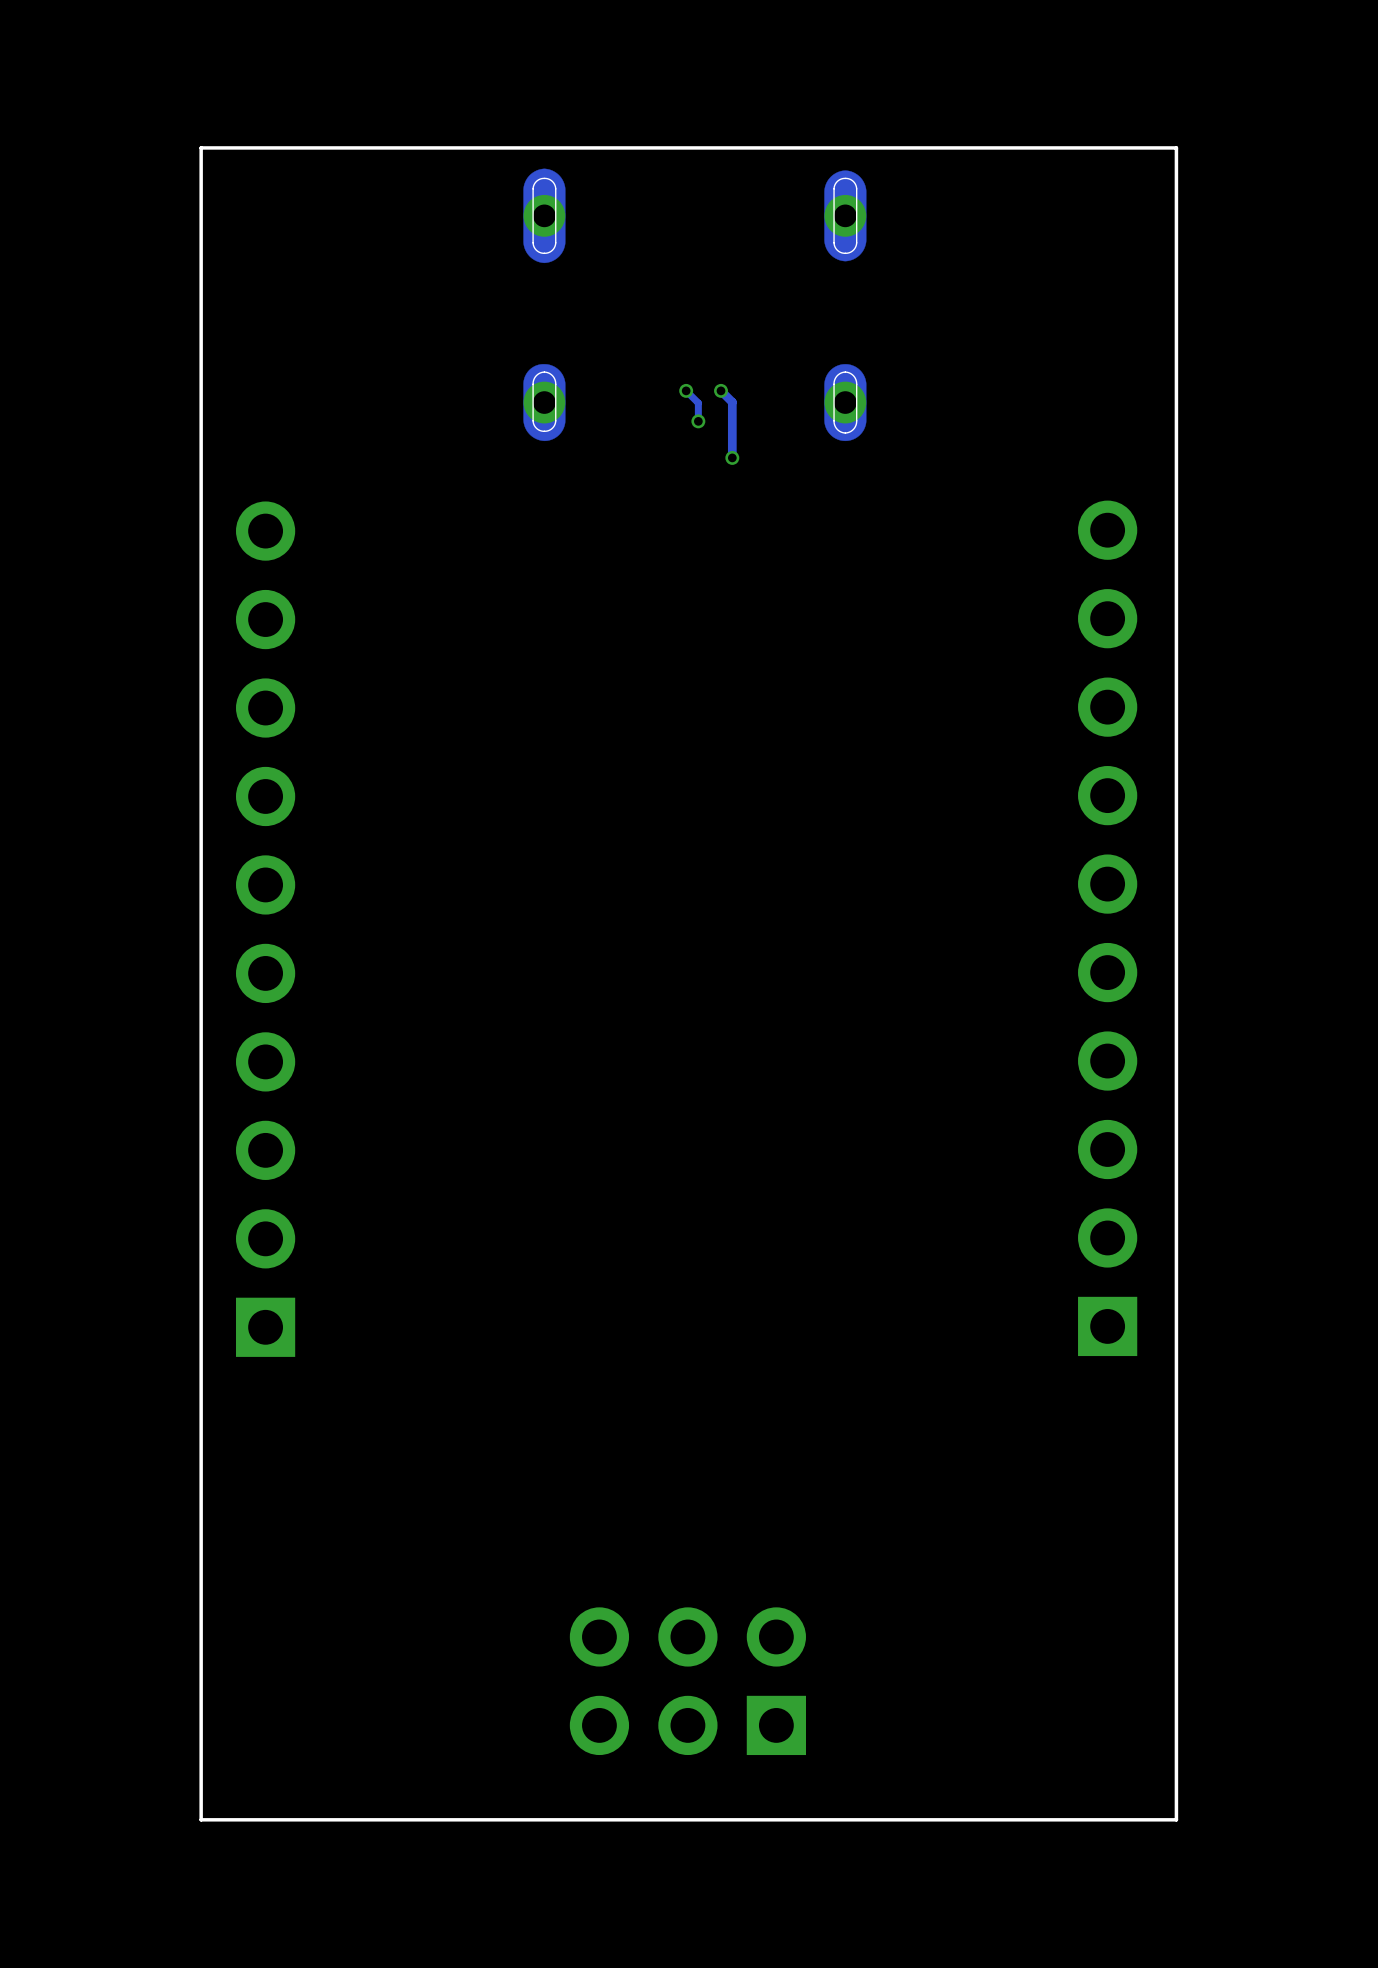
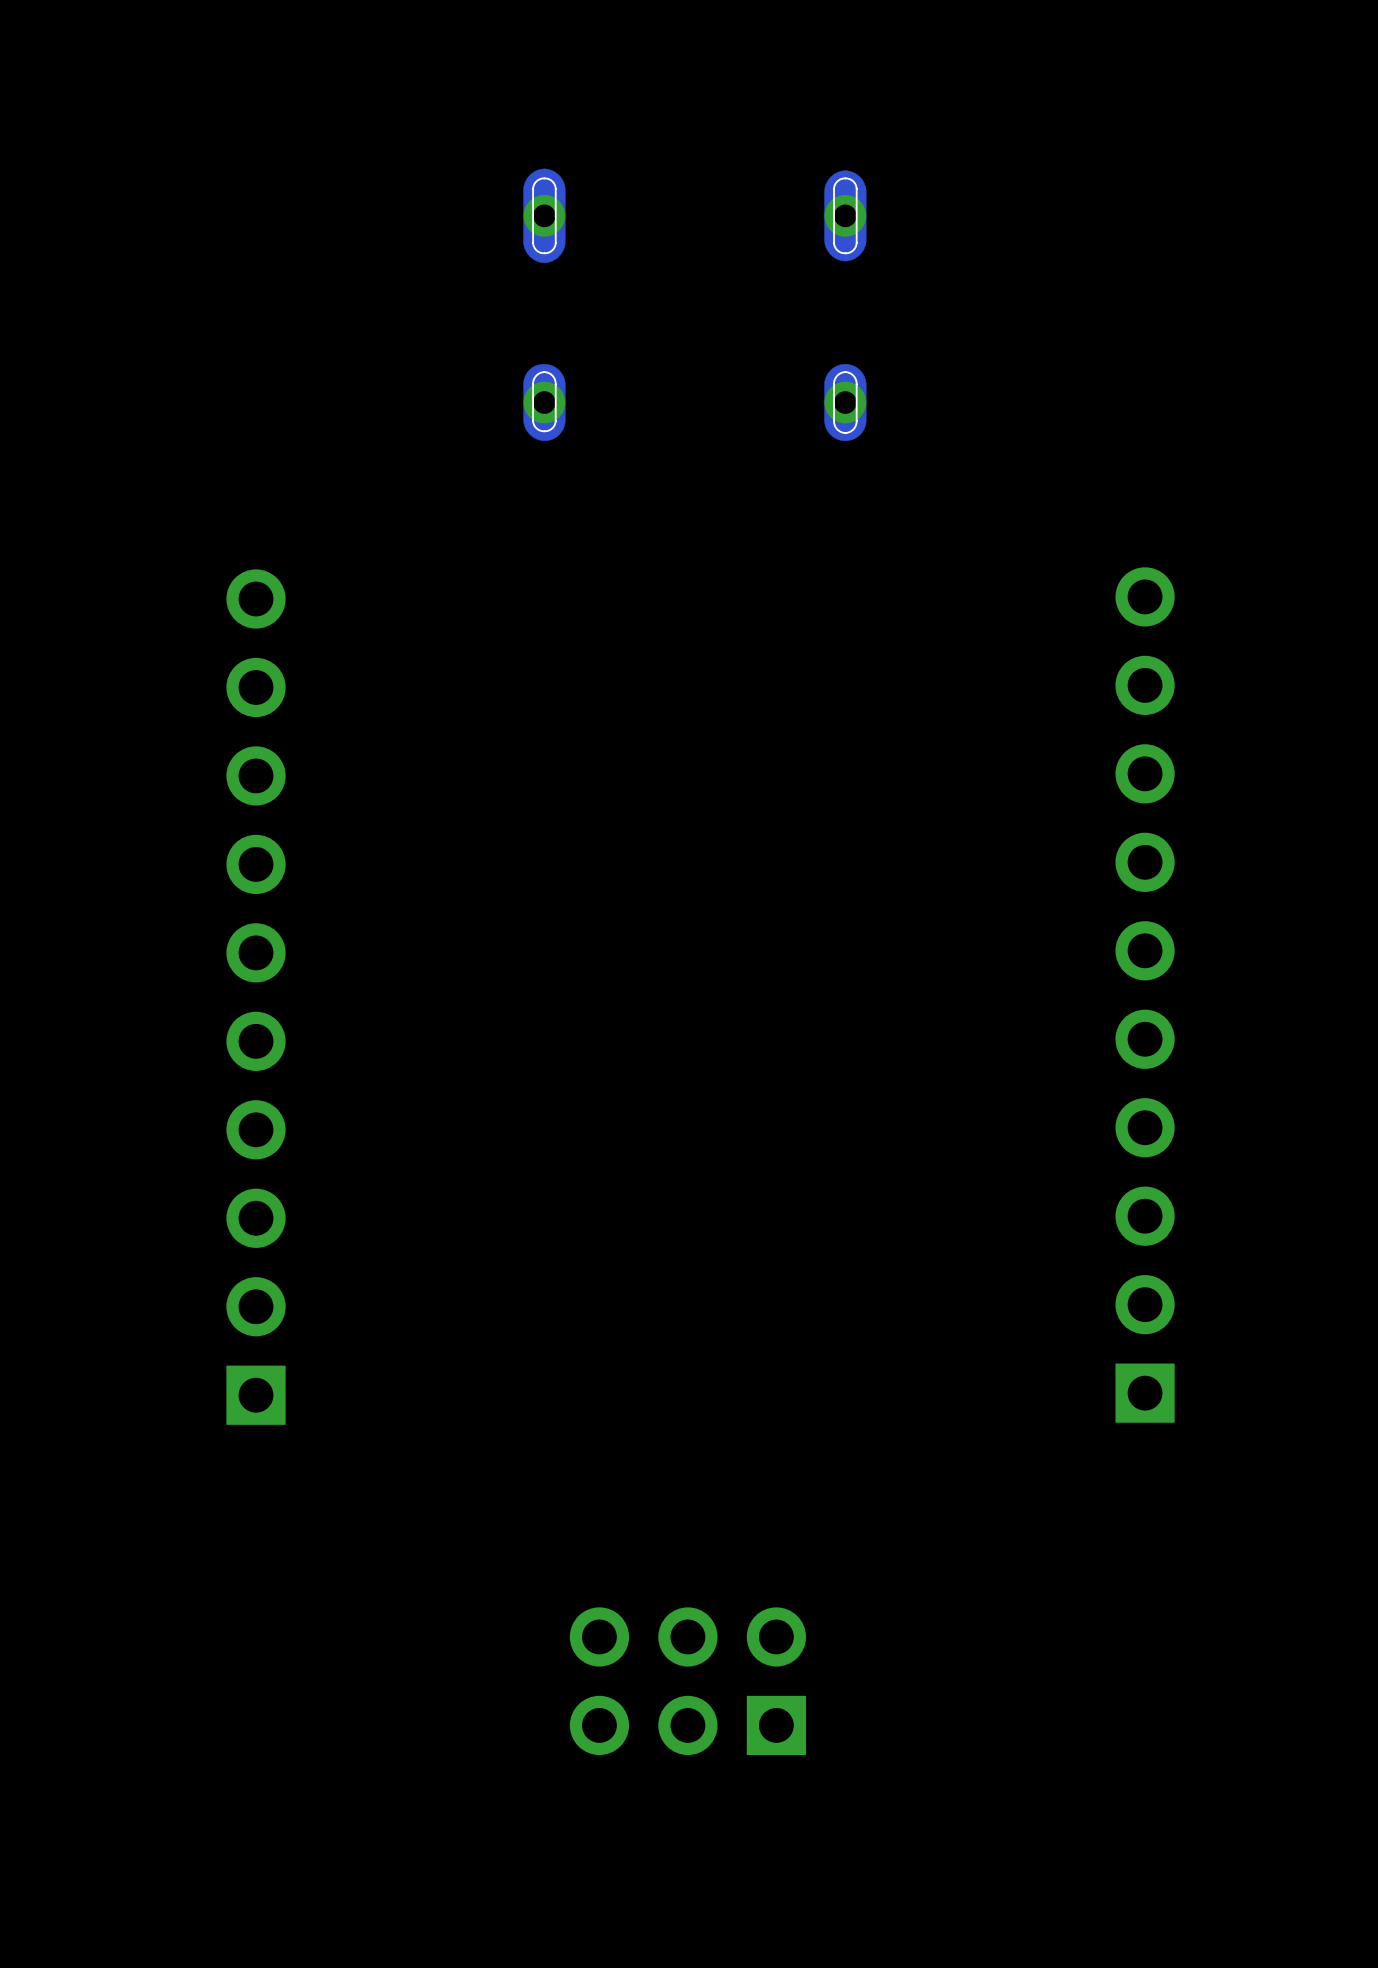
board edge: (1176, 147) (201, 147) (201, 1819) (1176, 1819) (1176, 147) -> none
track: (686, 390) (698, 403) (698, 421) -> none
via: (686, 390) -> none
track: (721, 390) (732, 402) (732, 457) -> none
via: (721, 390) -> none
via: (698, 421) -> none
via: (732, 457) -> none
part position: (1107, 928) -> (1145, 995)
part position: (265, 929) -> (256, 997)

